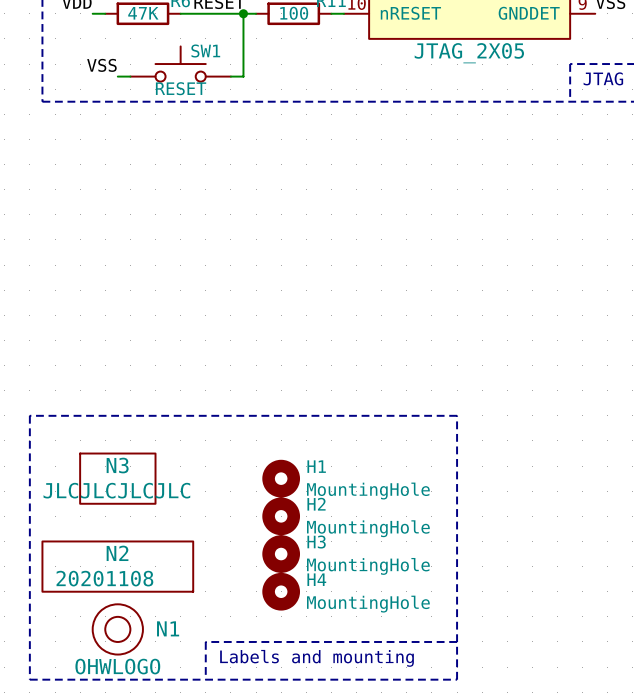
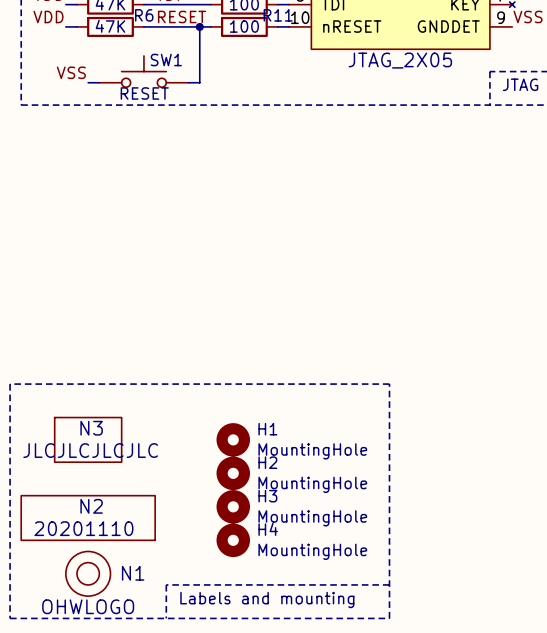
N2 value: 20201108 (104, 578) -> 20201110 (83, 528)

